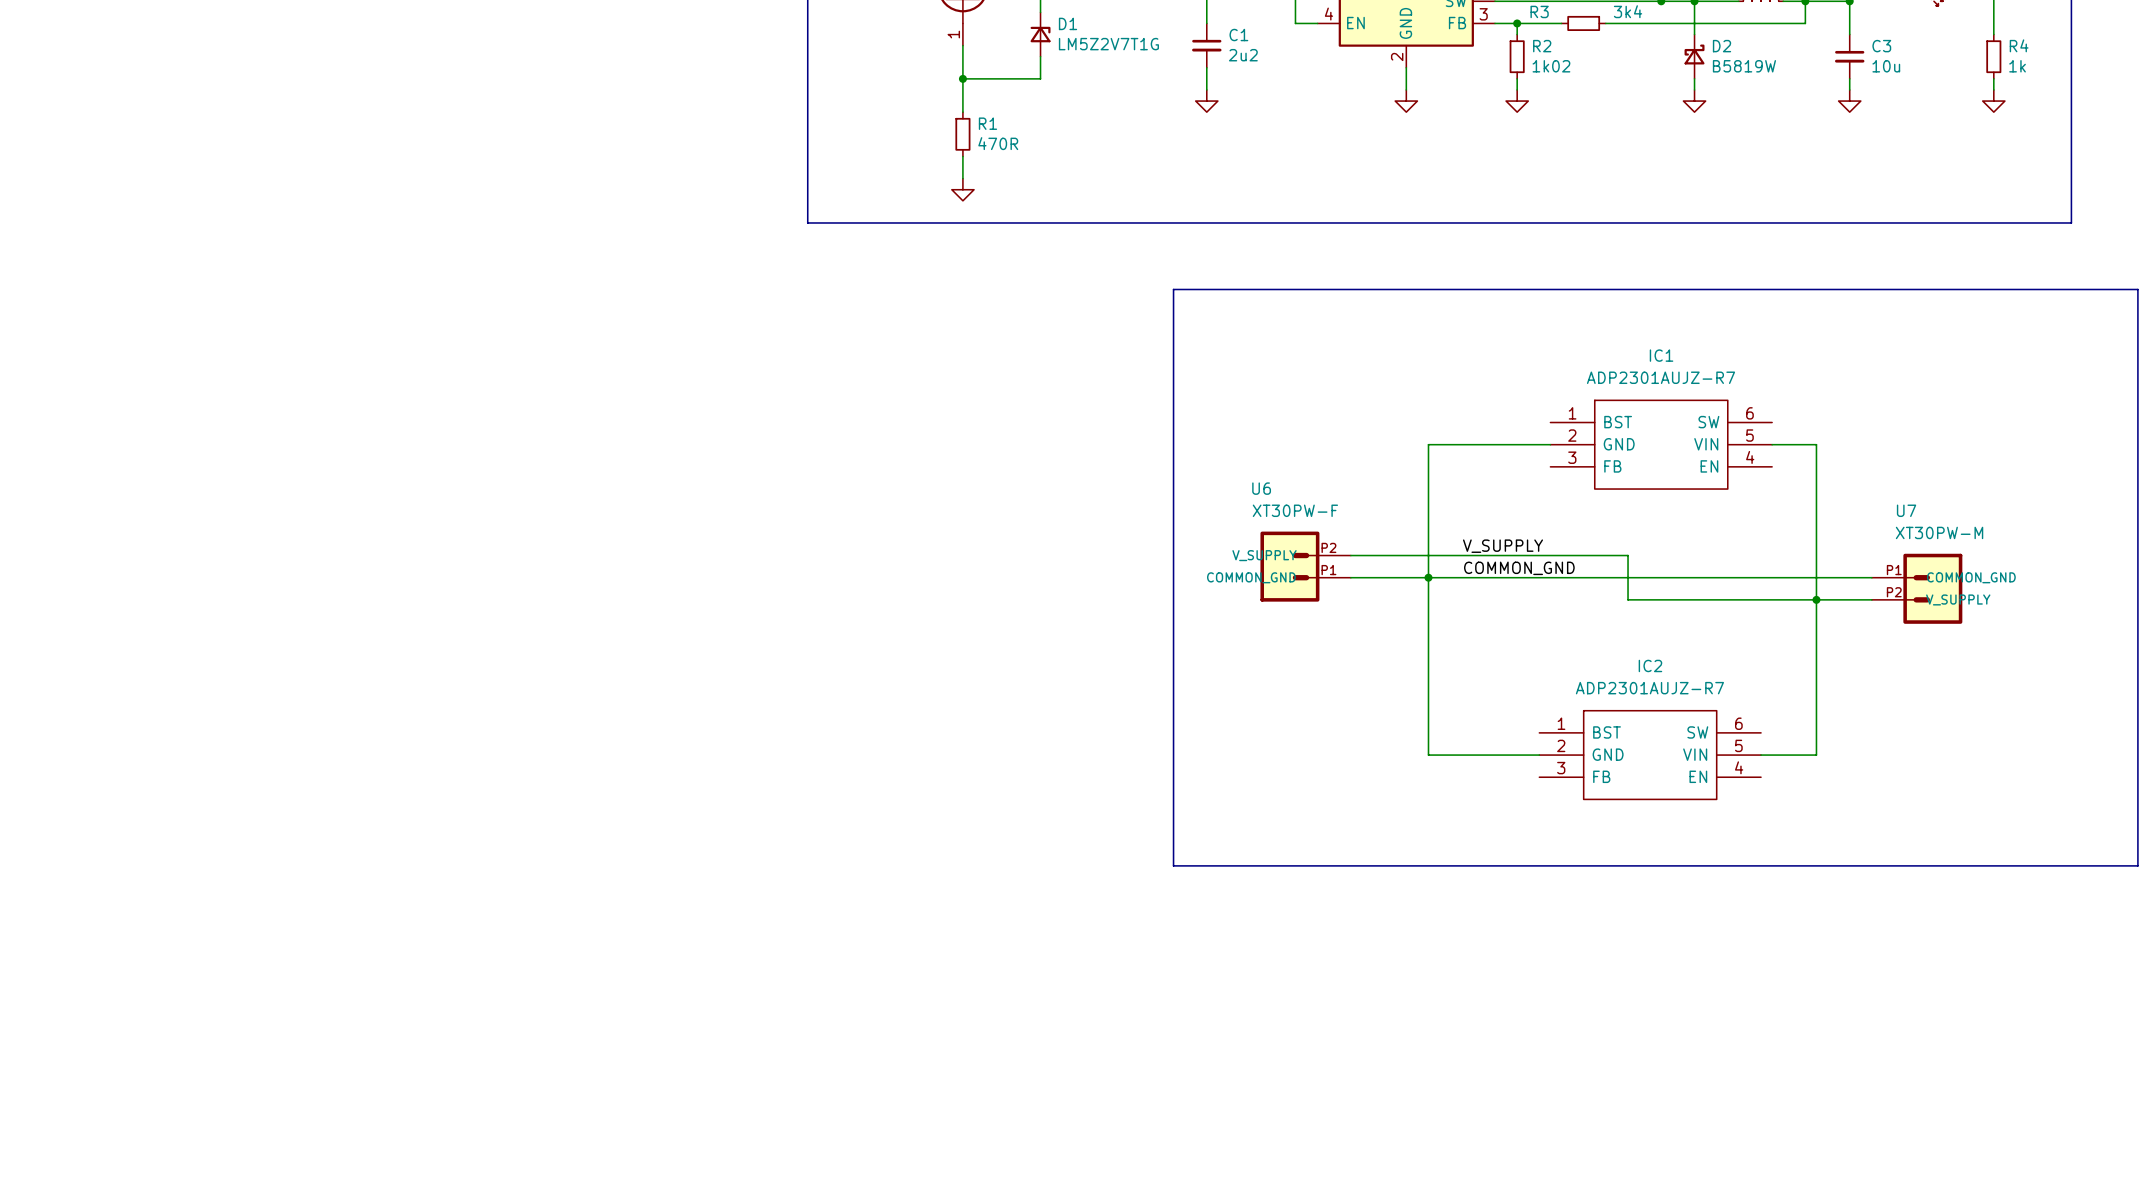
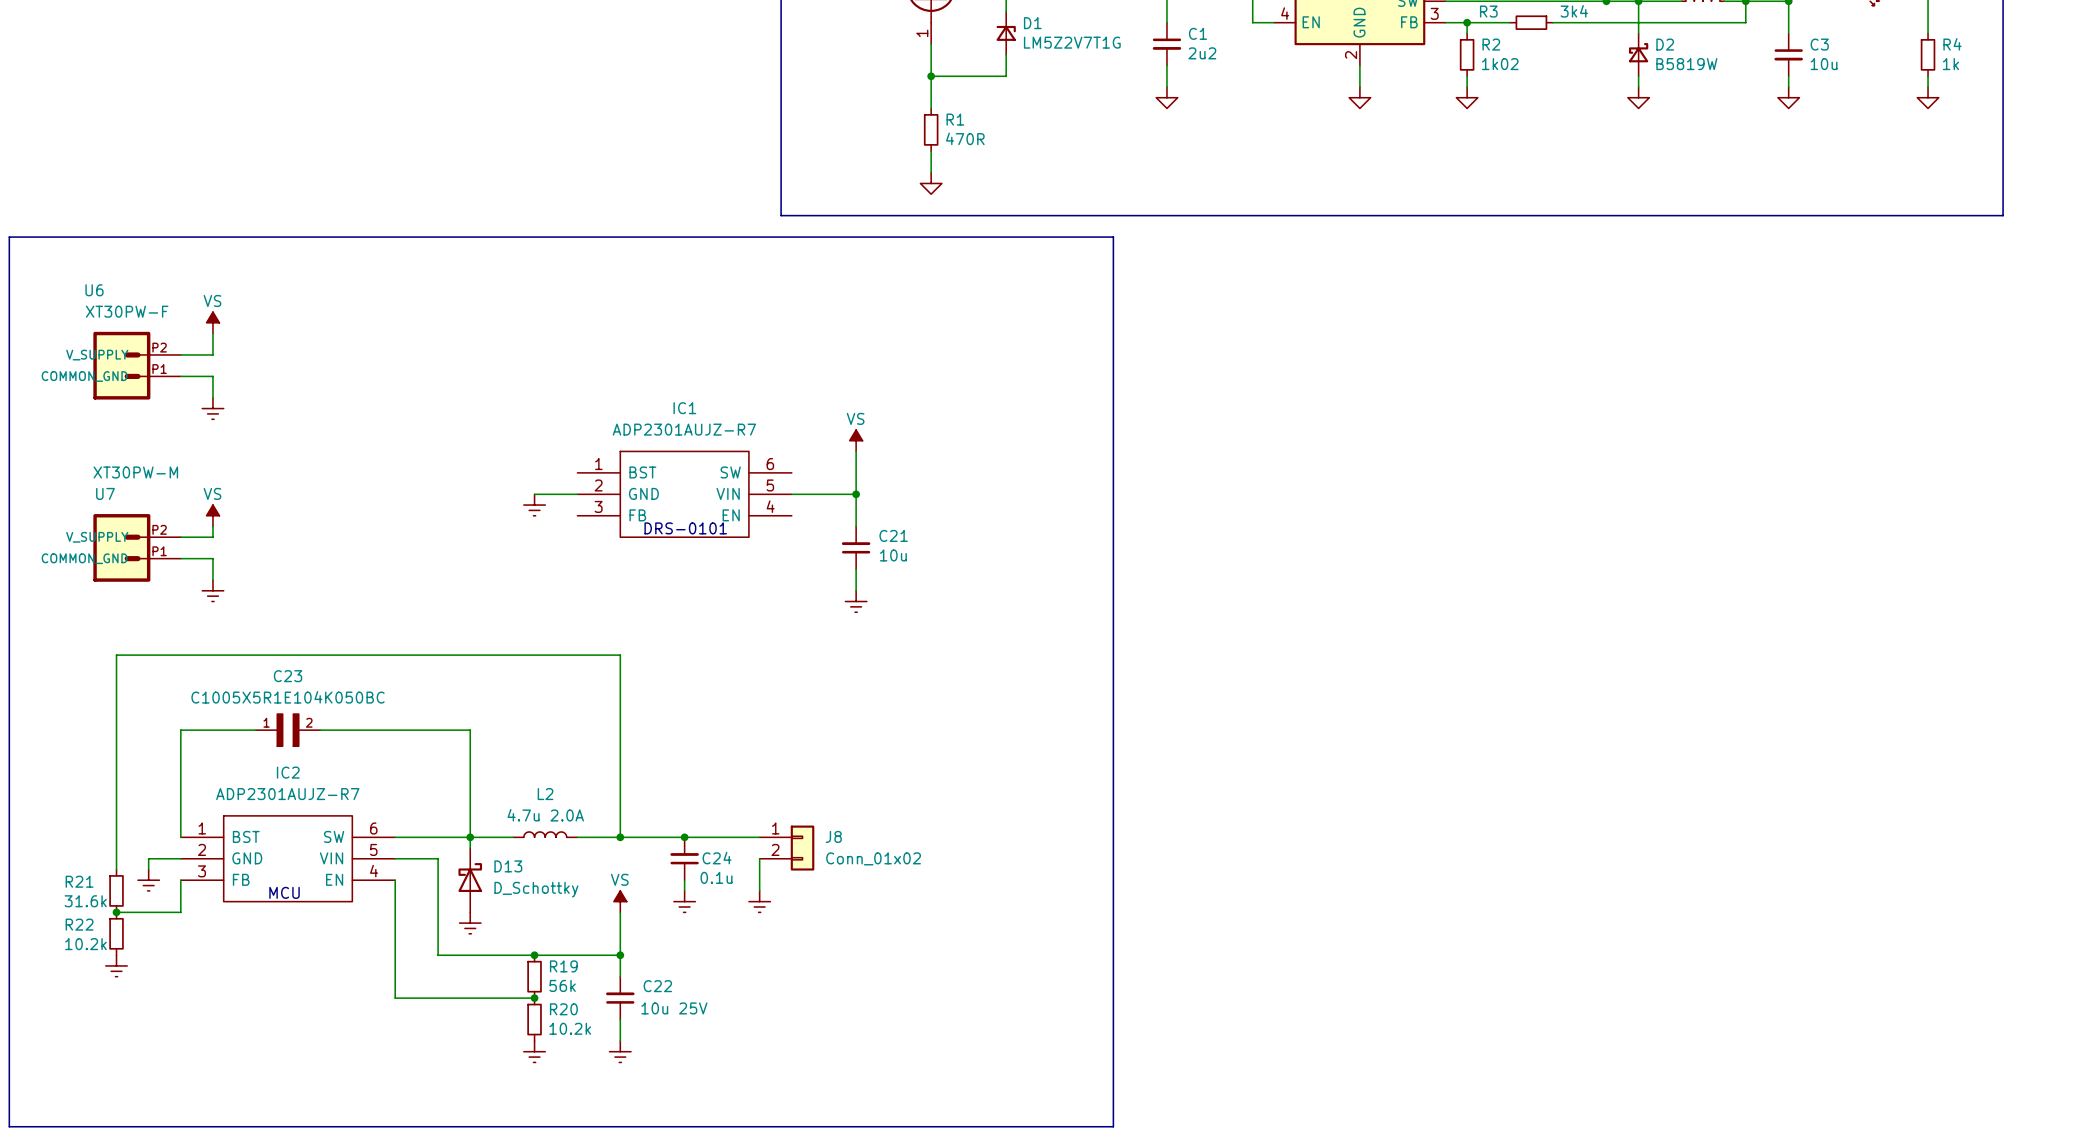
line: none -> (9, 237) (1113, 237) (1113, 1126) (9, 1126) (9, 237)
line: (1173, 289) (2137, 289) (2137, 865) (1173, 865) (1173, 289) -> none
power symbol: none -> VS (212, 322)
wire: none -> (212, 333) (212, 354) (180, 354)
wire: none -> (180, 376) (212, 376) (212, 397)
power symbol: none -> (212, 408)
wire: (1550, 444) (1428, 444) (1428, 755) (1539, 755) -> none
IC1 position: (1661, 444) -> (684, 494)
wire: (1772, 444) (1816, 444) (1816, 755) (1761, 755) -> none
power symbol: none -> VS (856, 440)
wire: none -> (856, 451) (856, 526)
U7 name position: U7 (1906, 510) -> U7 (105, 493)
wire: none -> (534, 494) (577, 494)
wire: none -> (791, 494) (856, 494)
junction: none -> (856, 494)
power symbol: none -> (534, 505)
U7 value position: XT30PW-M (1939, 532) -> XT30PW-M (135, 472)
power symbol: none -> VS (212, 515)
wire: none -> (212, 526) (212, 537) (180, 537)
text: none -> DRS-0101 (685, 528)
label: V_SUPPLY (1503, 546) -> none
wire: (1350, 555) (1628, 555) (1628, 599) (1871, 599) -> none
C21: none -> 10u (856, 547)
U6 position: (1305, 566) -> (137, 365)
label: COMMON_GND (1519, 568) -> none
wire: none -> (180, 558) (212, 558) (212, 580)
wire: (1350, 577) (1871, 577) -> none
junction: (1428, 577) -> none
wire: none -> (856, 569) (856, 590)
U7 position: (1917, 588) -> (137, 547)
U7 rotation: 0° (1932, 588) -> 180° (121, 547)
junction: (1816, 599) -> none
power symbol: none -> (212, 590)
power symbol: none -> (856, 601)
wire: none -> (255, 730) (180, 730) (180, 837)
C23: none -> C1005X5R1E104K050BC (288, 730)
wire: none -> (320, 730) (470, 730) (470, 848)
IC2 position: (1650, 755) -> (288, 858)
L2: none -> 4.7u 2.0A (545, 834)
wire: none -> (395, 837) (513, 837)
junction: none -> (470, 837)
wire: none -> (577, 837) (759, 837)
wire: none -> (620, 837) (620, 655) (116, 655) (116, 869)
junction: none -> (620, 837)
junction: none -> (684, 837)
J8: none -> Conn_01x02 (786, 848)
wire: none -> (180, 858) (148, 858) (148, 869)
wire: none -> (395, 858) (438, 858) (438, 955) (620, 955)
C24: none -> 0.1u (684, 858)
wire: none -> (759, 858) (759, 890)
power symbol: none -> (148, 880)
wire: none -> (180, 880) (180, 912) (116, 912)
wire: none -> (395, 880) (395, 998) (534, 998)
D13: none -> D_Schottky (470, 880)
wire: none -> (684, 880) (684, 890)
R21: none -> 31.6k (116, 890)
text: none -> MCU (284, 892)
power symbol: none -> VS (620, 901)
power symbol: none -> (684, 901)
power symbol: none -> (759, 901)
junction: none -> (116, 912)
wire: none -> (620, 912) (620, 976)
power symbol: none -> (470, 923)
R22: none -> 10.2k (116, 933)
junction: none -> (534, 955)
junction: none -> (620, 955)
power symbol: none -> (116, 965)
R19: none -> 56k (534, 976)
junction: none -> (534, 998)
C22: none -> 10u 25V (620, 998)
R20: none -> 10.2k (534, 1019)
wire: none -> (620, 1019) (620, 1040)
power symbol: none -> (534, 1051)
power symbol: none -> (620, 1051)

